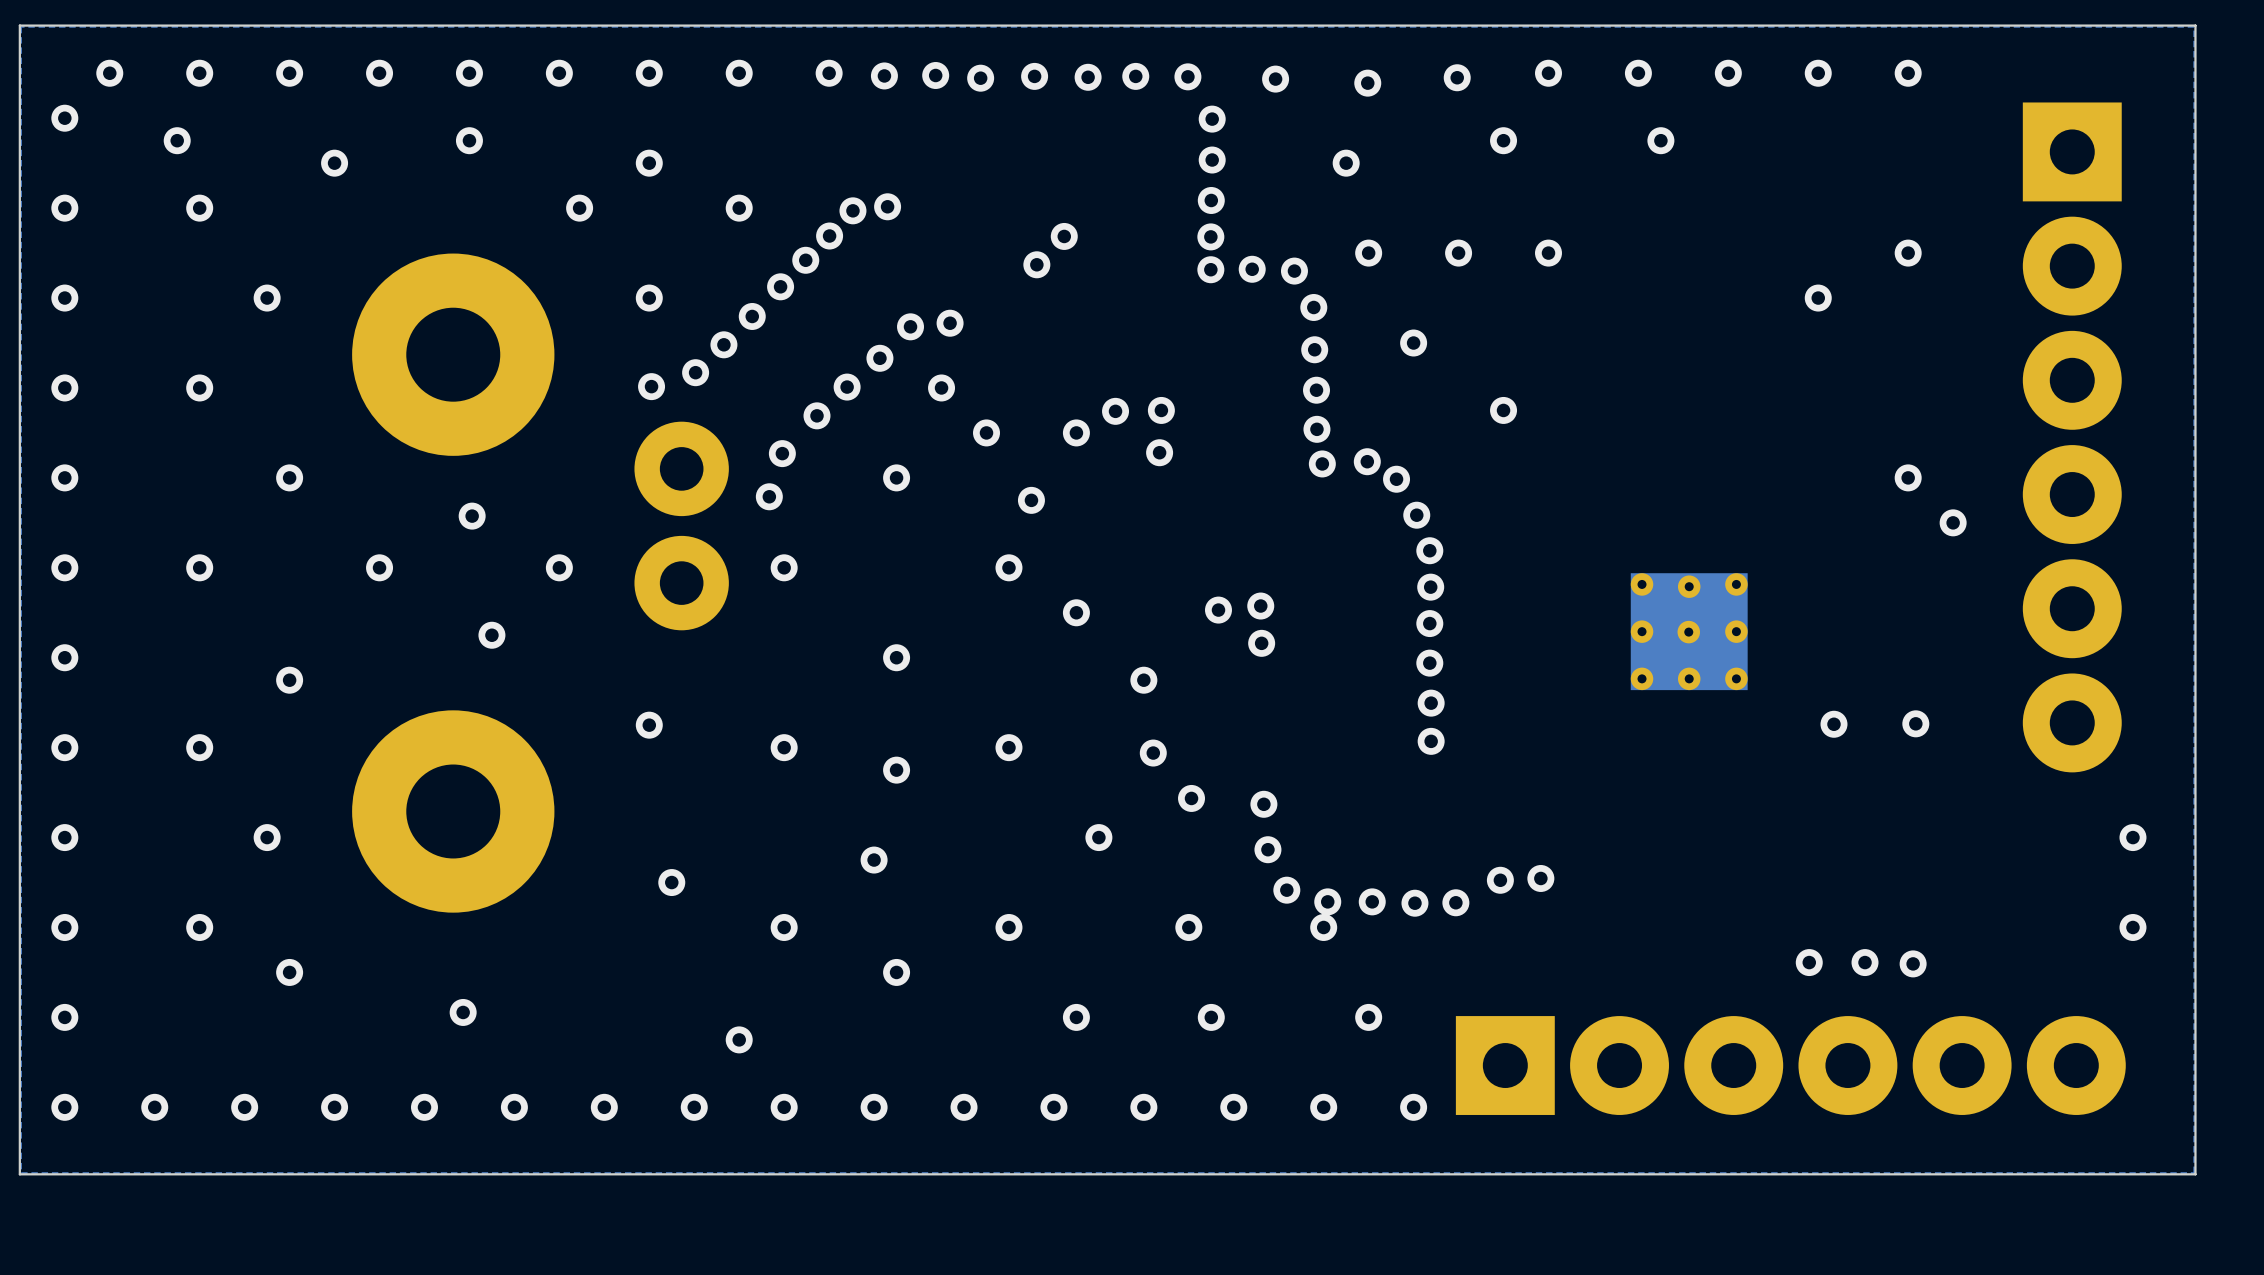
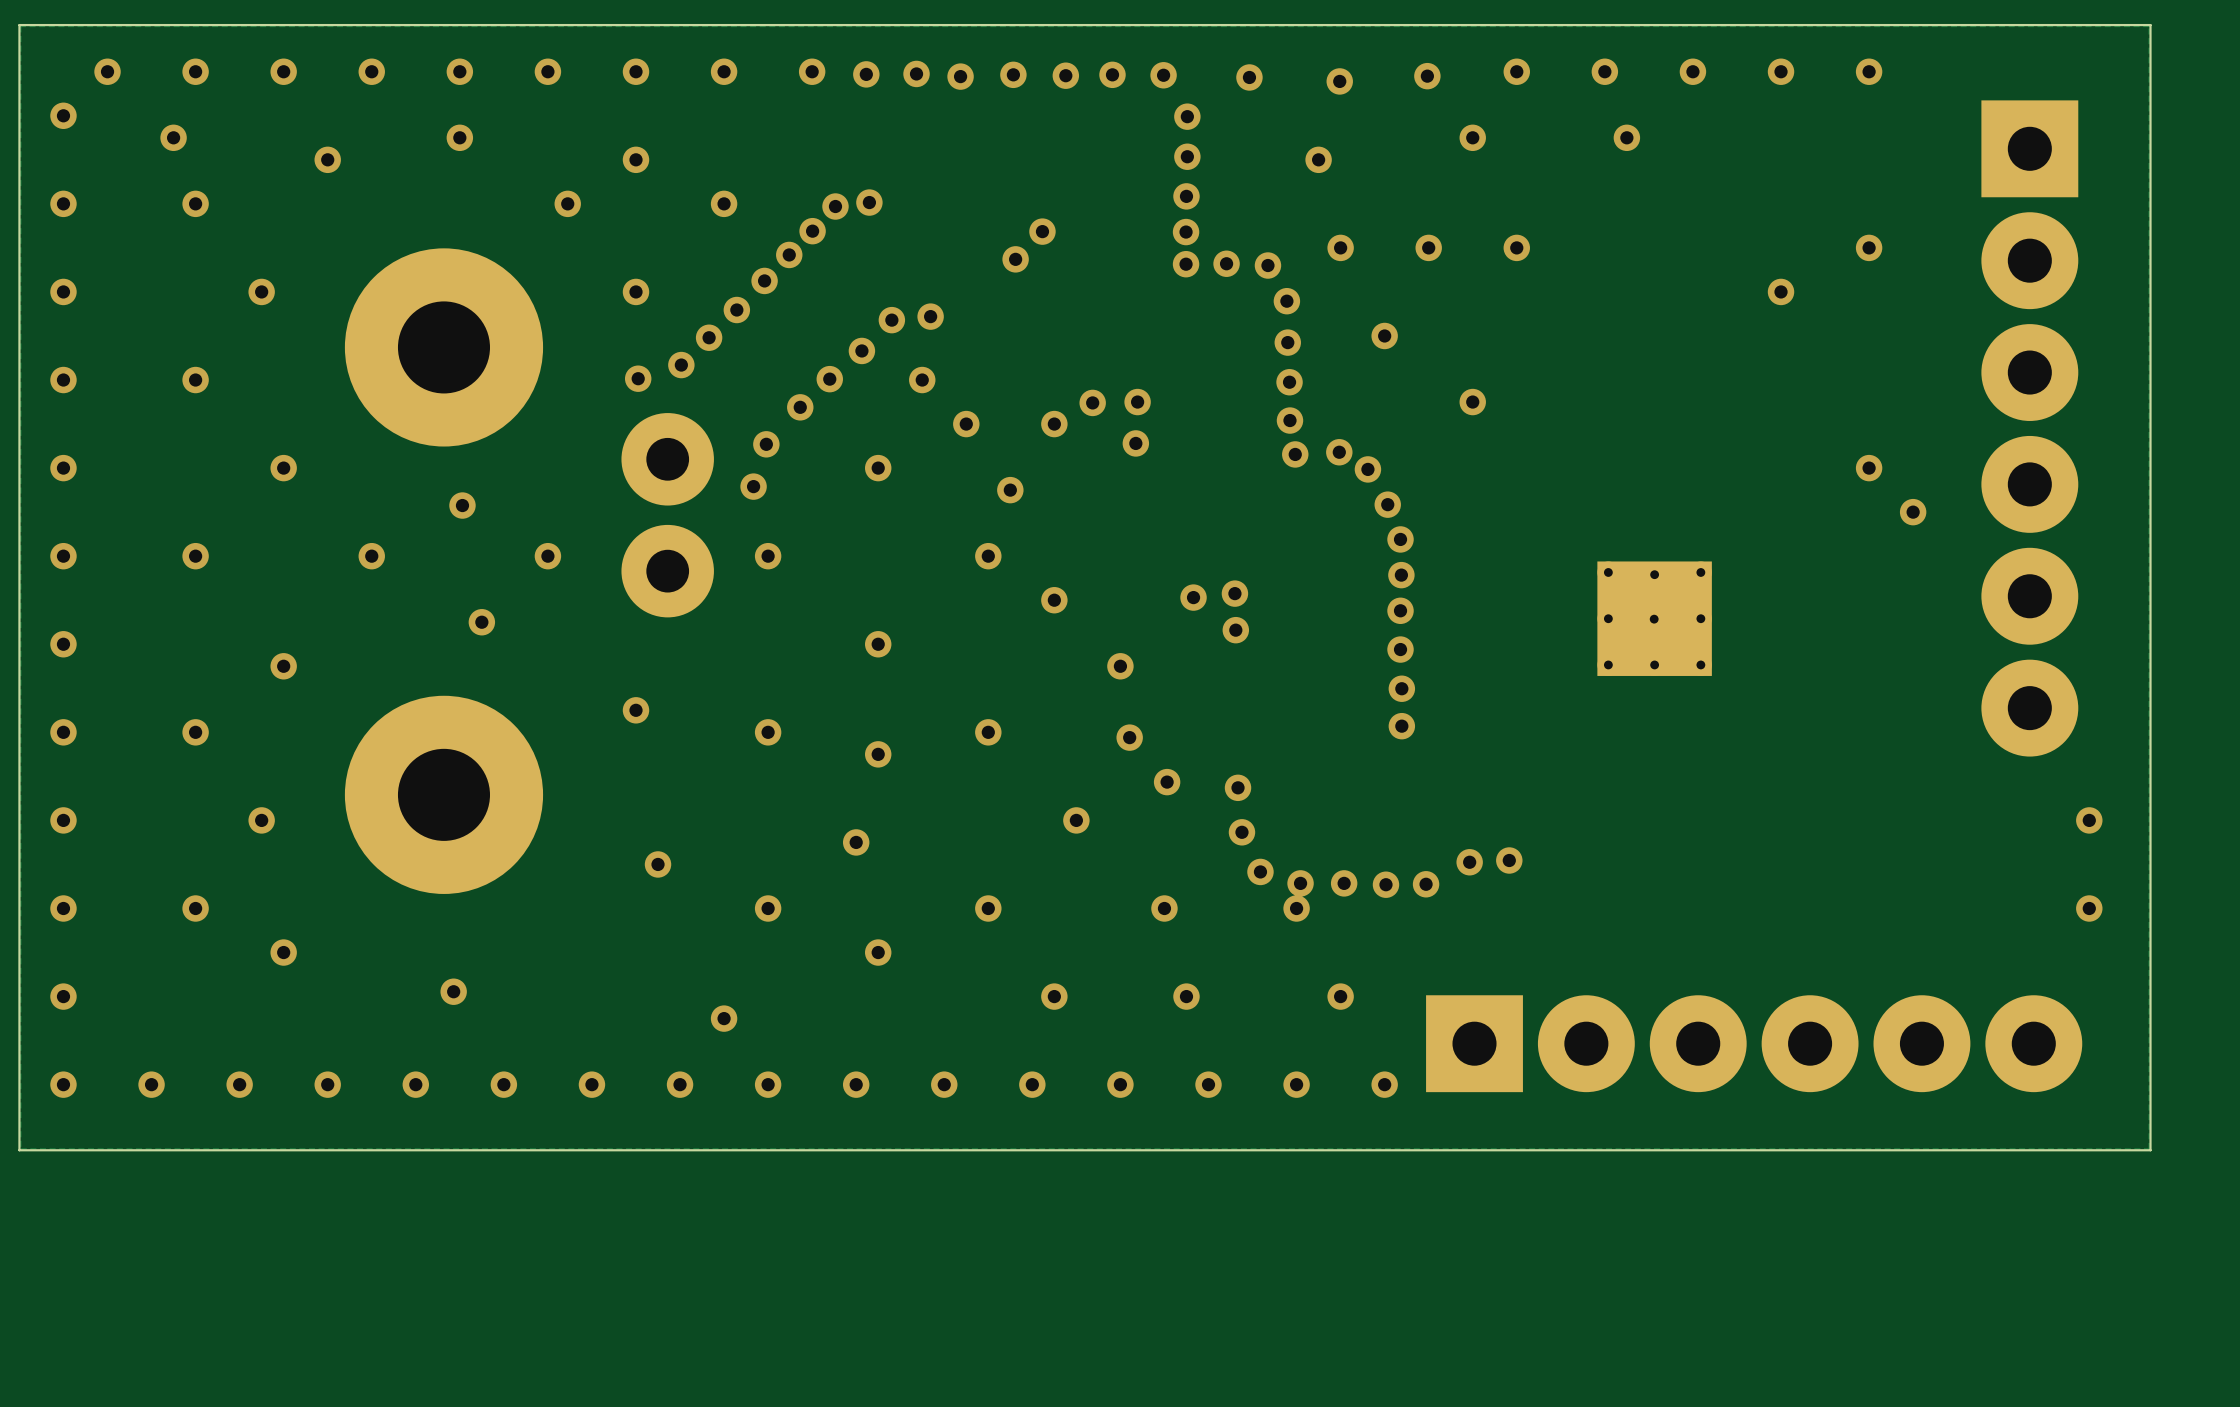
via: (1915, 723) -> none
via: (1833, 724) -> none
via: (1809, 962) -> none
via: (1865, 962) -> none
via: (1913, 963) -> none

